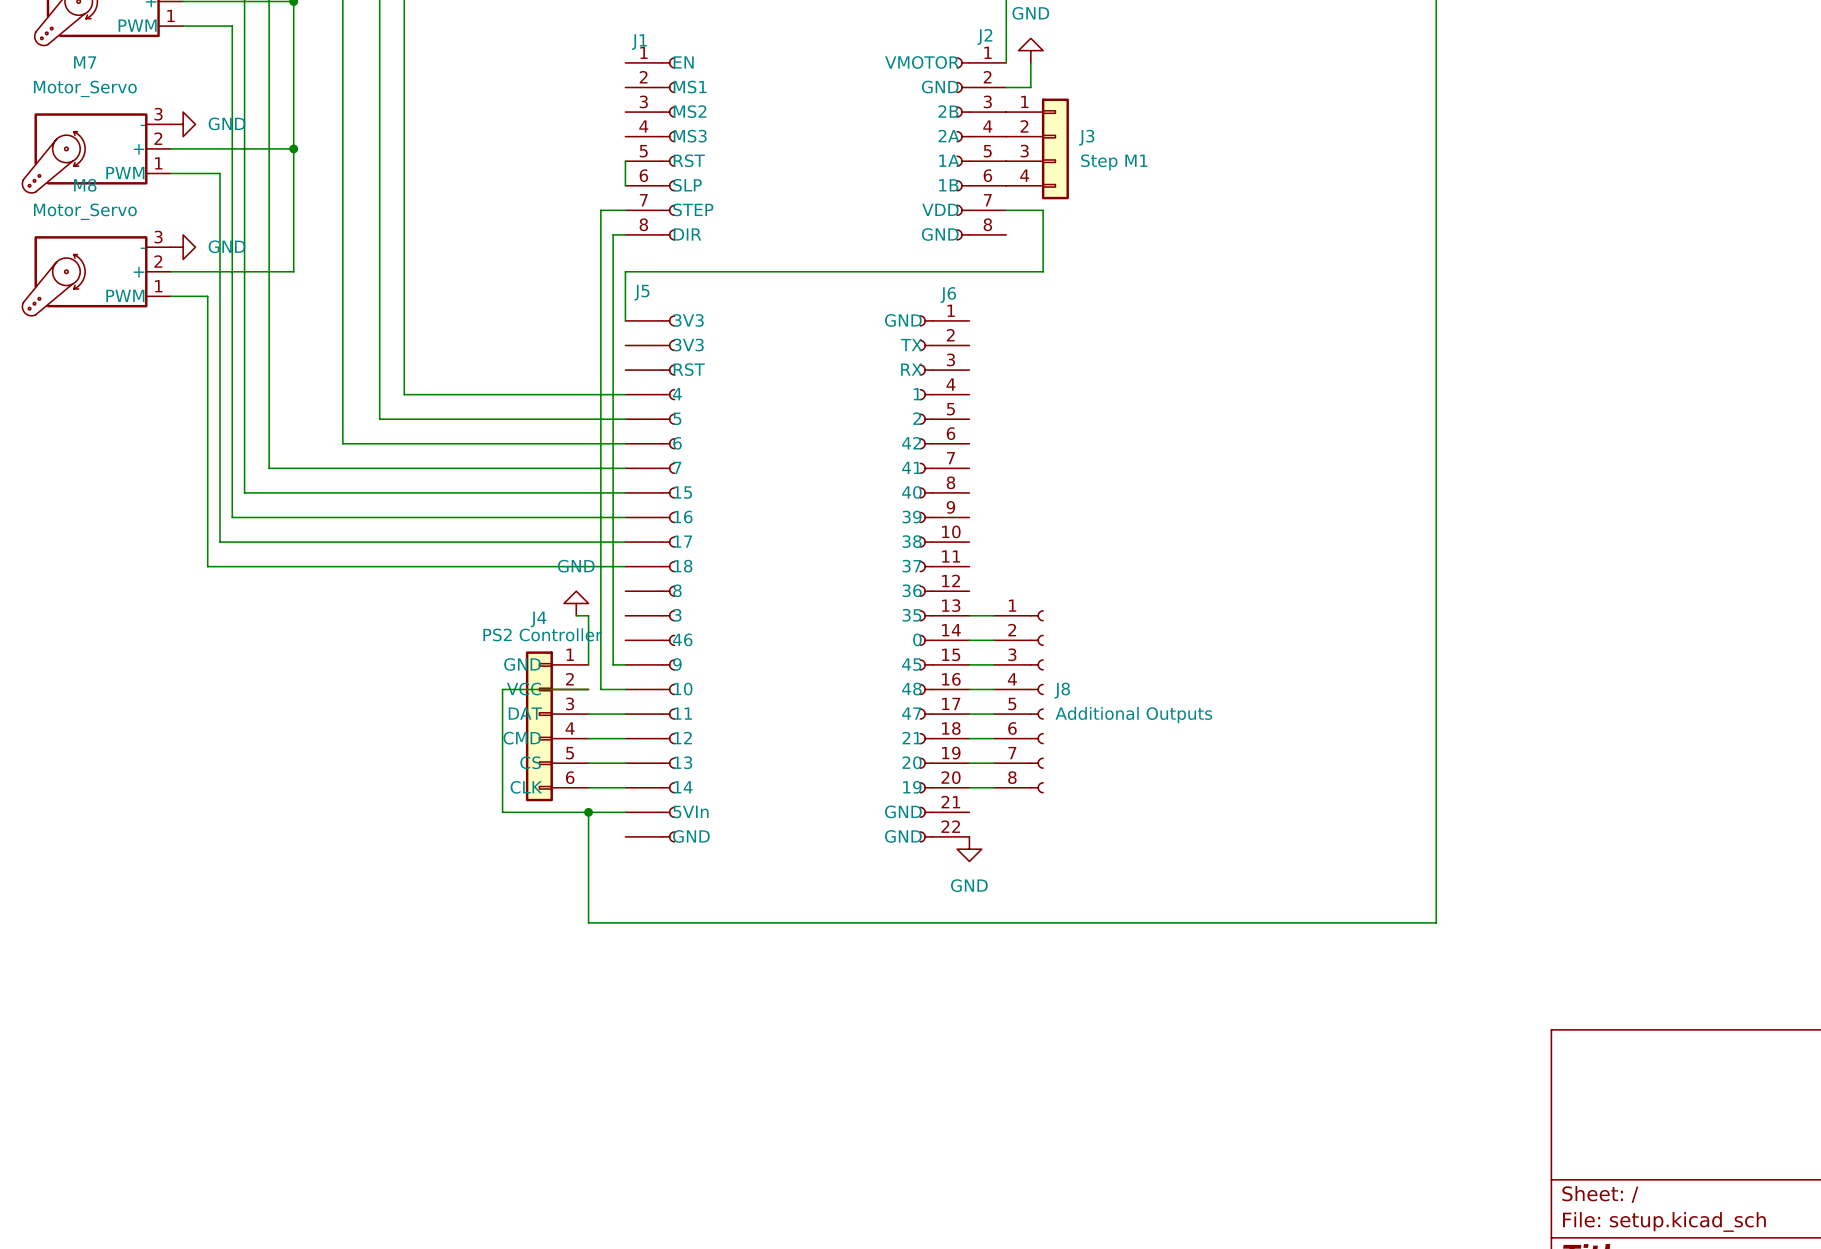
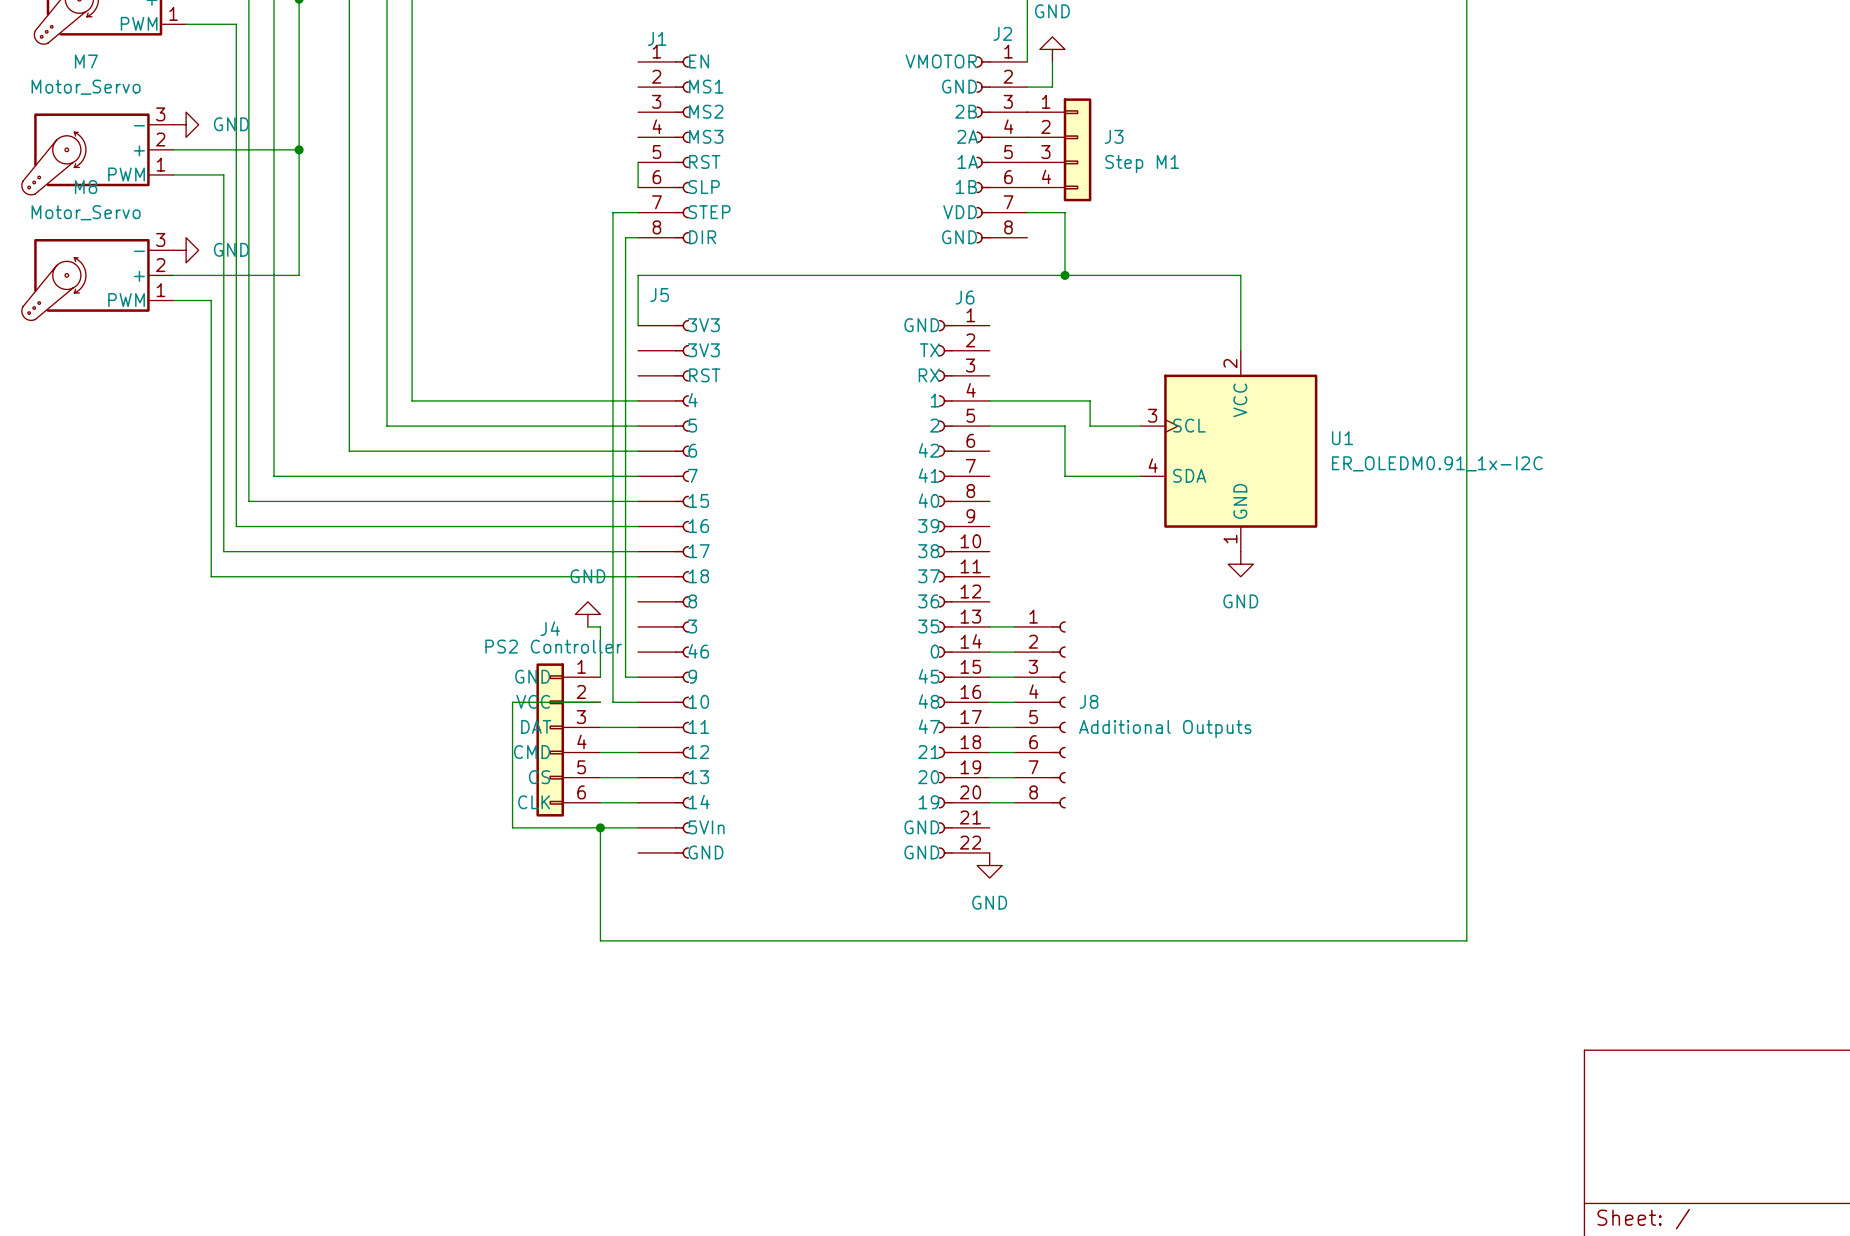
wire: none -> (1065, 275) (1240, 275) (1240, 350)
junction: none -> (1065, 275)
wire: none -> (989, 400) (1090, 400) (1090, 426) (1140, 426)
wire: none -> (989, 426) (1065, 426) (1065, 476) (1140, 476)
U1: none -> ER_OLEDM0.91_1x-I2C (1228, 451)
power symbol: none -> GND (1240, 564)

